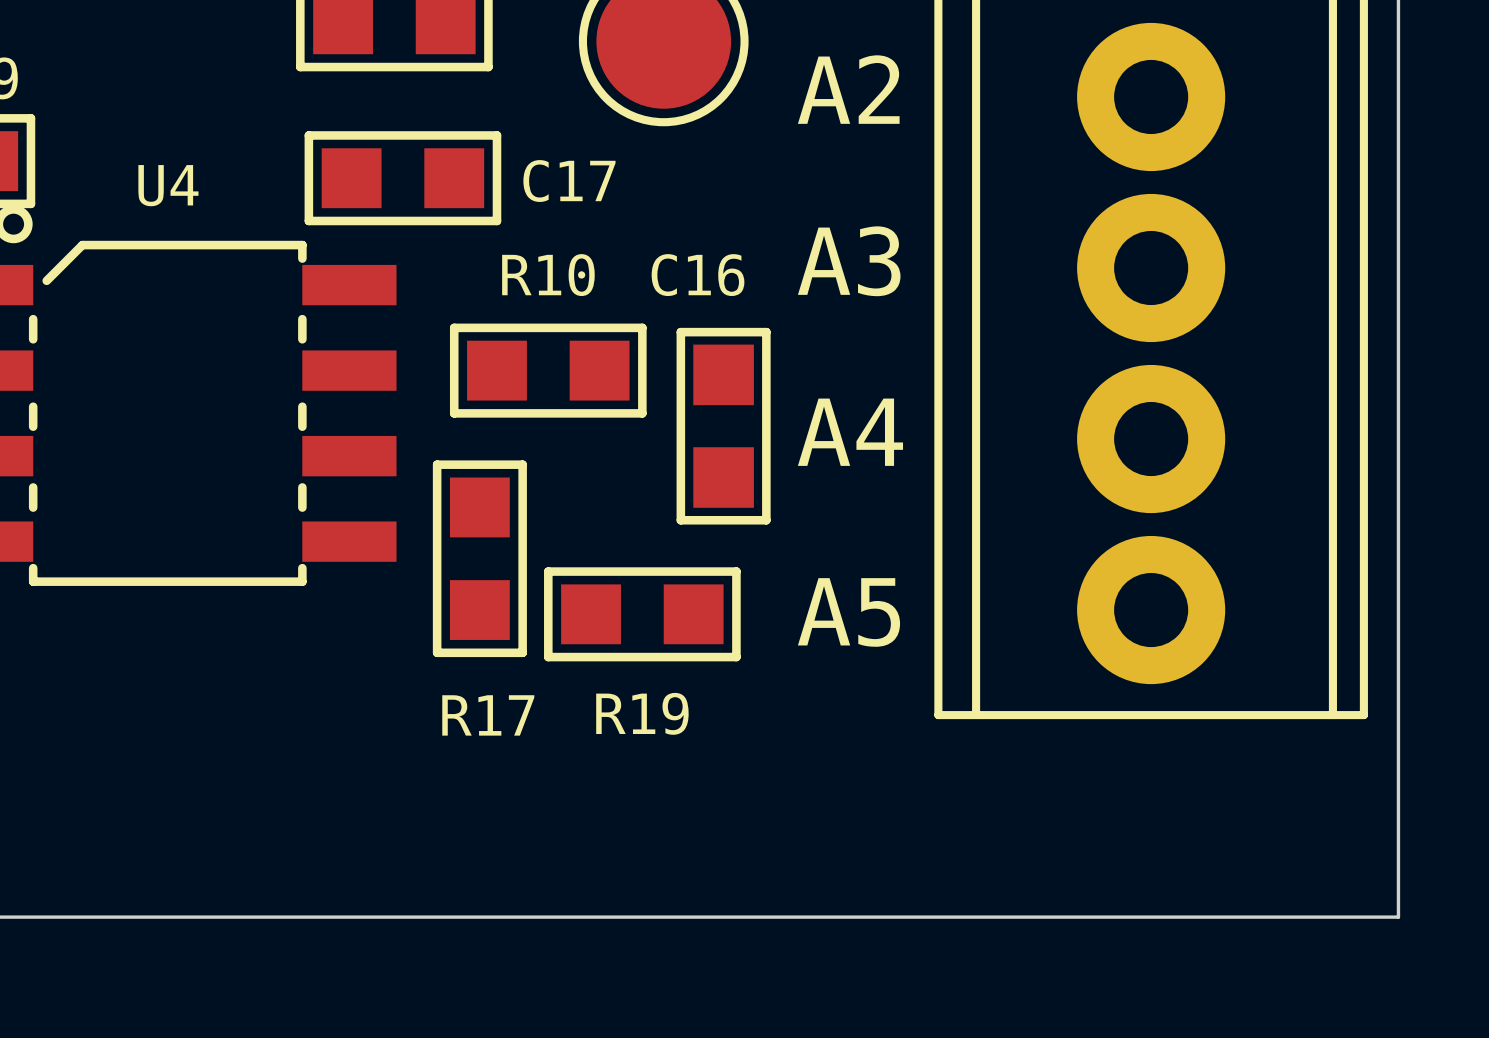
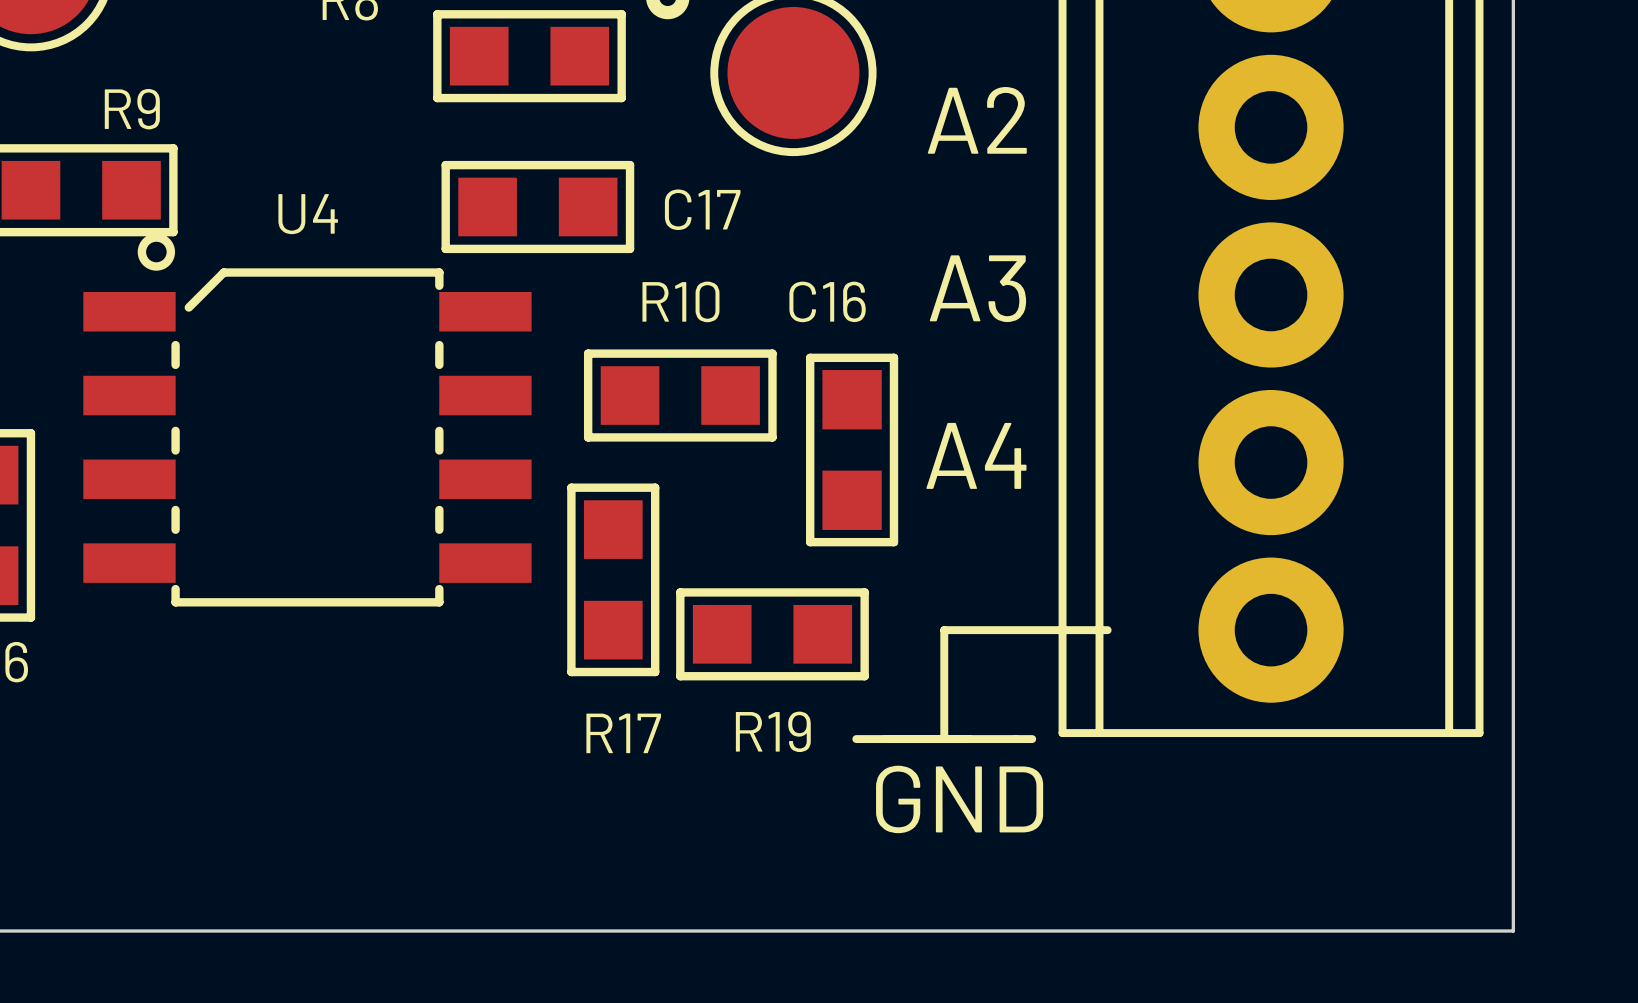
line: none -> (1107, 630) (944, 630) (944, 739)
text: A5 (848, 612) -> none
line: none -> (856, 739) (1032, 739)
text: none -> GND (959, 799)

